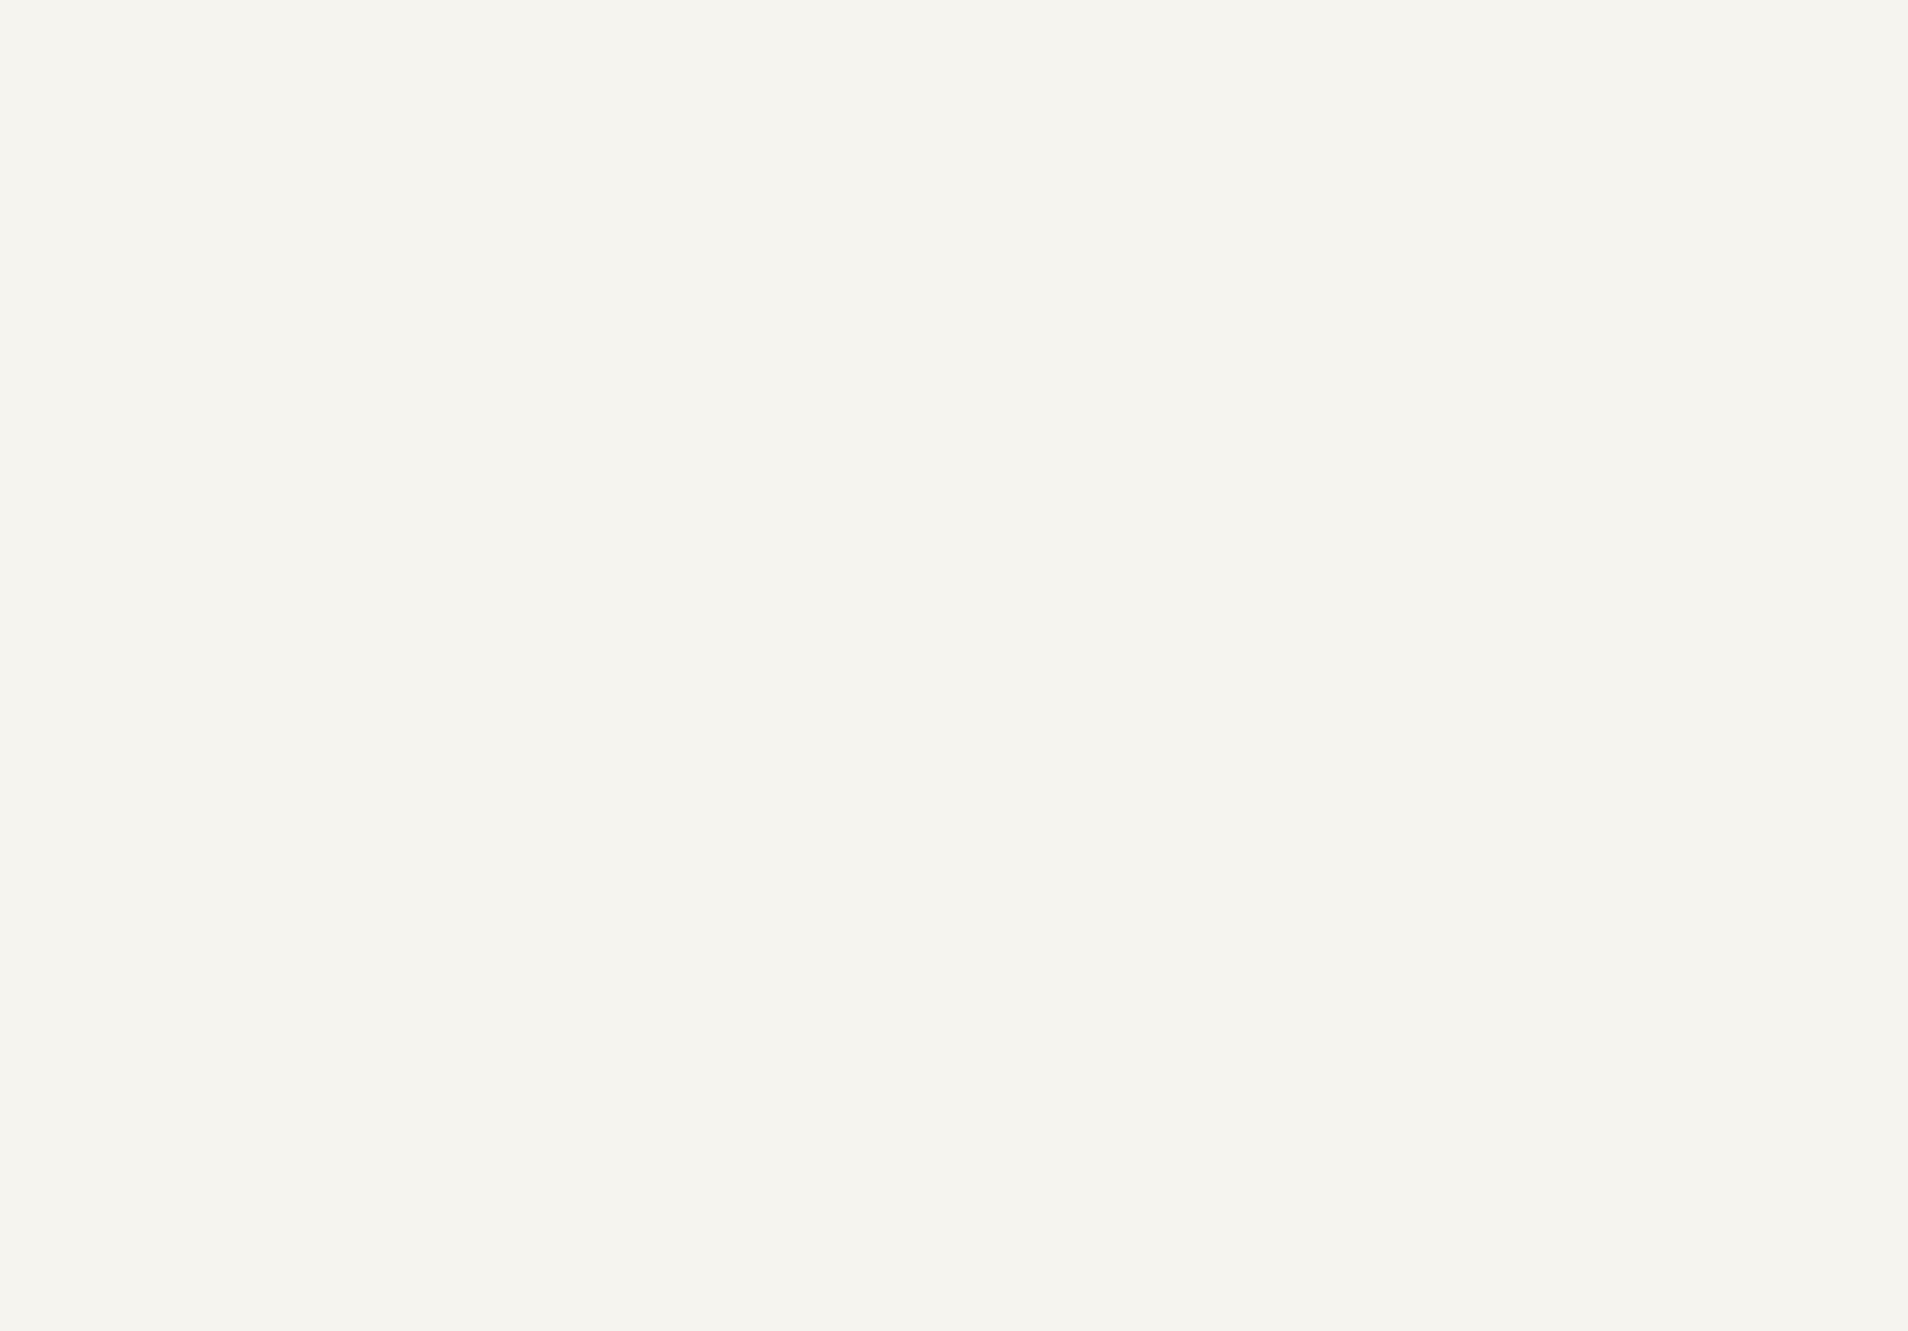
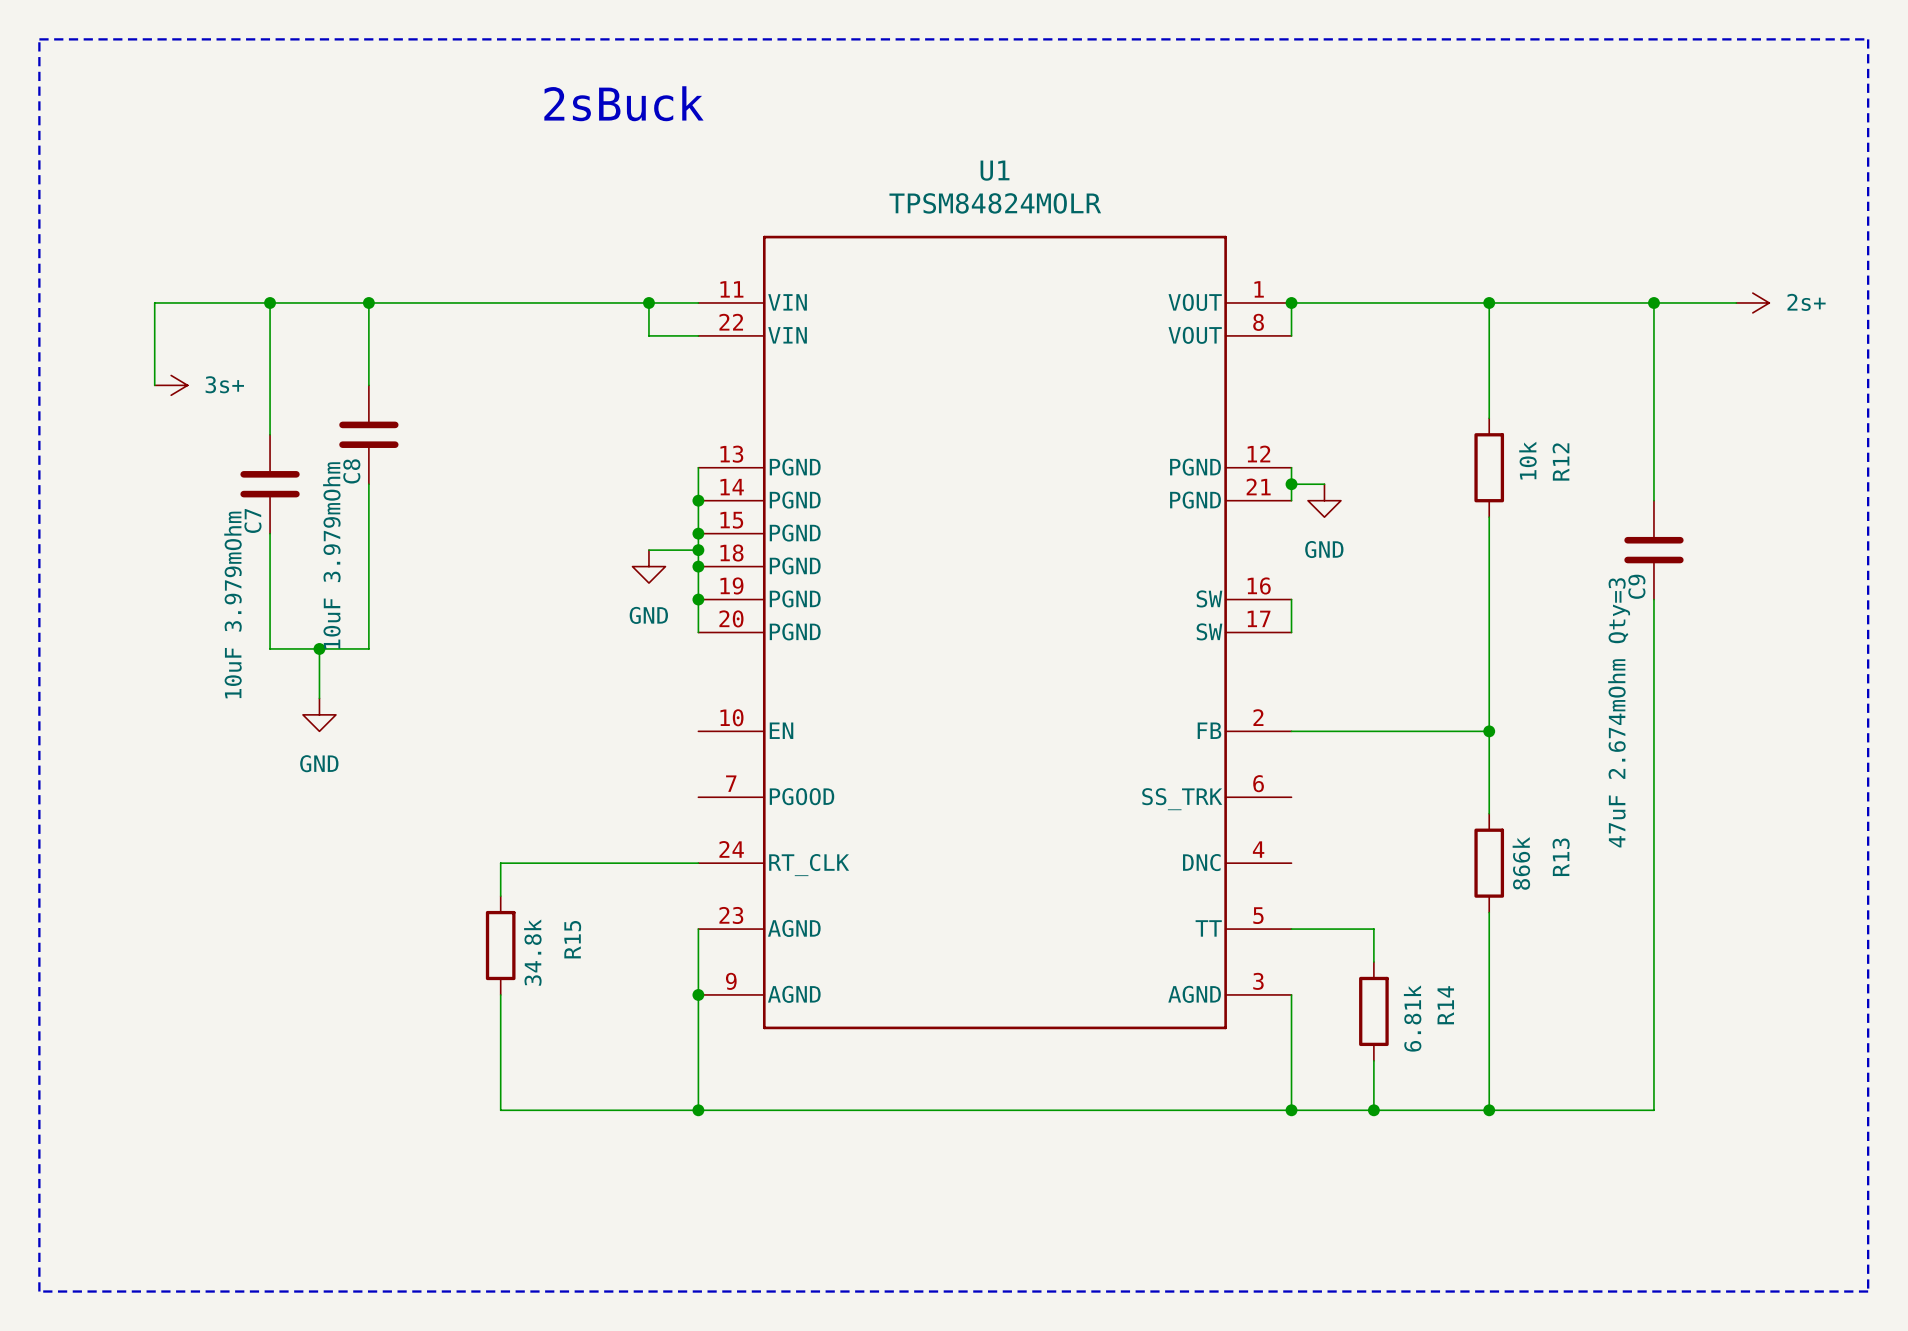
line: none -> (39, 39) (1868, 39) (1868, 1291) (39, 1291) (39, 39)
text: none -> 2sBuck (623, 103)
wire: none -> (270, 302) (270, 434)
junction: none -> (270, 302)
wire: none -> (368, 302) (368, 385)
junction: none -> (368, 302)
wire: none -> (648, 302) (648, 335) (698, 335)
junction: none -> (648, 302)
wire: none -> (698, 302) (154, 302) (154, 385)
junction: none -> (1291, 302)
wire: none -> (1489, 302) (1489, 418)
junction: none -> (1489, 302)
wire: none -> (1653, 302) (1653, 500)
junction: none -> (1653, 302)
wire: none -> (1736, 302) (1291, 302) (1291, 335)
power symbol: none -> 2s+ (1752, 302)
power symbol: none -> 3s+ (171, 385)
C8: none -> 10uF 3.979mOhm (368, 434)
wire: none -> (698, 467) (698, 632)
wire: none -> (1291, 467) (1291, 500)
R12: none -> 10k (1489, 467)
C7: none -> 10uF 3.979mOhm (270, 484)
wire: none -> (368, 484) (368, 648) (270, 648) (270, 533)
wire: none -> (1291, 484) (1324, 484)
junction: none -> (1291, 484)
junction: none -> (698, 500)
power symbol: none -> GND (1324, 500)
wire: none -> (1489, 517) (1489, 813)
junction: none -> (698, 533)
wire: none -> (648, 550) (698, 550)
junction: none -> (698, 550)
C9: none -> 47uF 2.674mOhm Qty=3 (1653, 550)
power symbol: none -> GND (648, 566)
junction: none -> (698, 566)
junction: none -> (698, 599)
wire: none -> (1291, 599) (1291, 632)
wire: none -> (1653, 599) (1653, 1110) (500, 1110) (500, 994)
U1: none -> TPSM84824MOLR (994, 632)
wire: none -> (319, 648) (319, 698)
junction: none -> (319, 648)
power symbol: none -> GND (319, 714)
wire: none -> (1291, 731) (1489, 731)
junction: none -> (1489, 731)
wire: none -> (698, 863) (500, 863) (500, 896)
R13: none -> 866k (1489, 863)
wire: none -> (1489, 912) (1489, 1110)
wire: none -> (698, 929) (698, 1110)
wire: none -> (1291, 929) (1373, 929) (1373, 962)
R15: none -> 34.8k (500, 945)
junction: none -> (698, 994)
wire: none -> (1291, 994) (1291, 1110)
R14: none -> 6.81k (1373, 1011)
wire: none -> (1373, 1060) (1373, 1110)
junction: none -> (698, 1110)
junction: none -> (1291, 1110)
junction: none -> (1373, 1110)
junction: none -> (1489, 1110)

